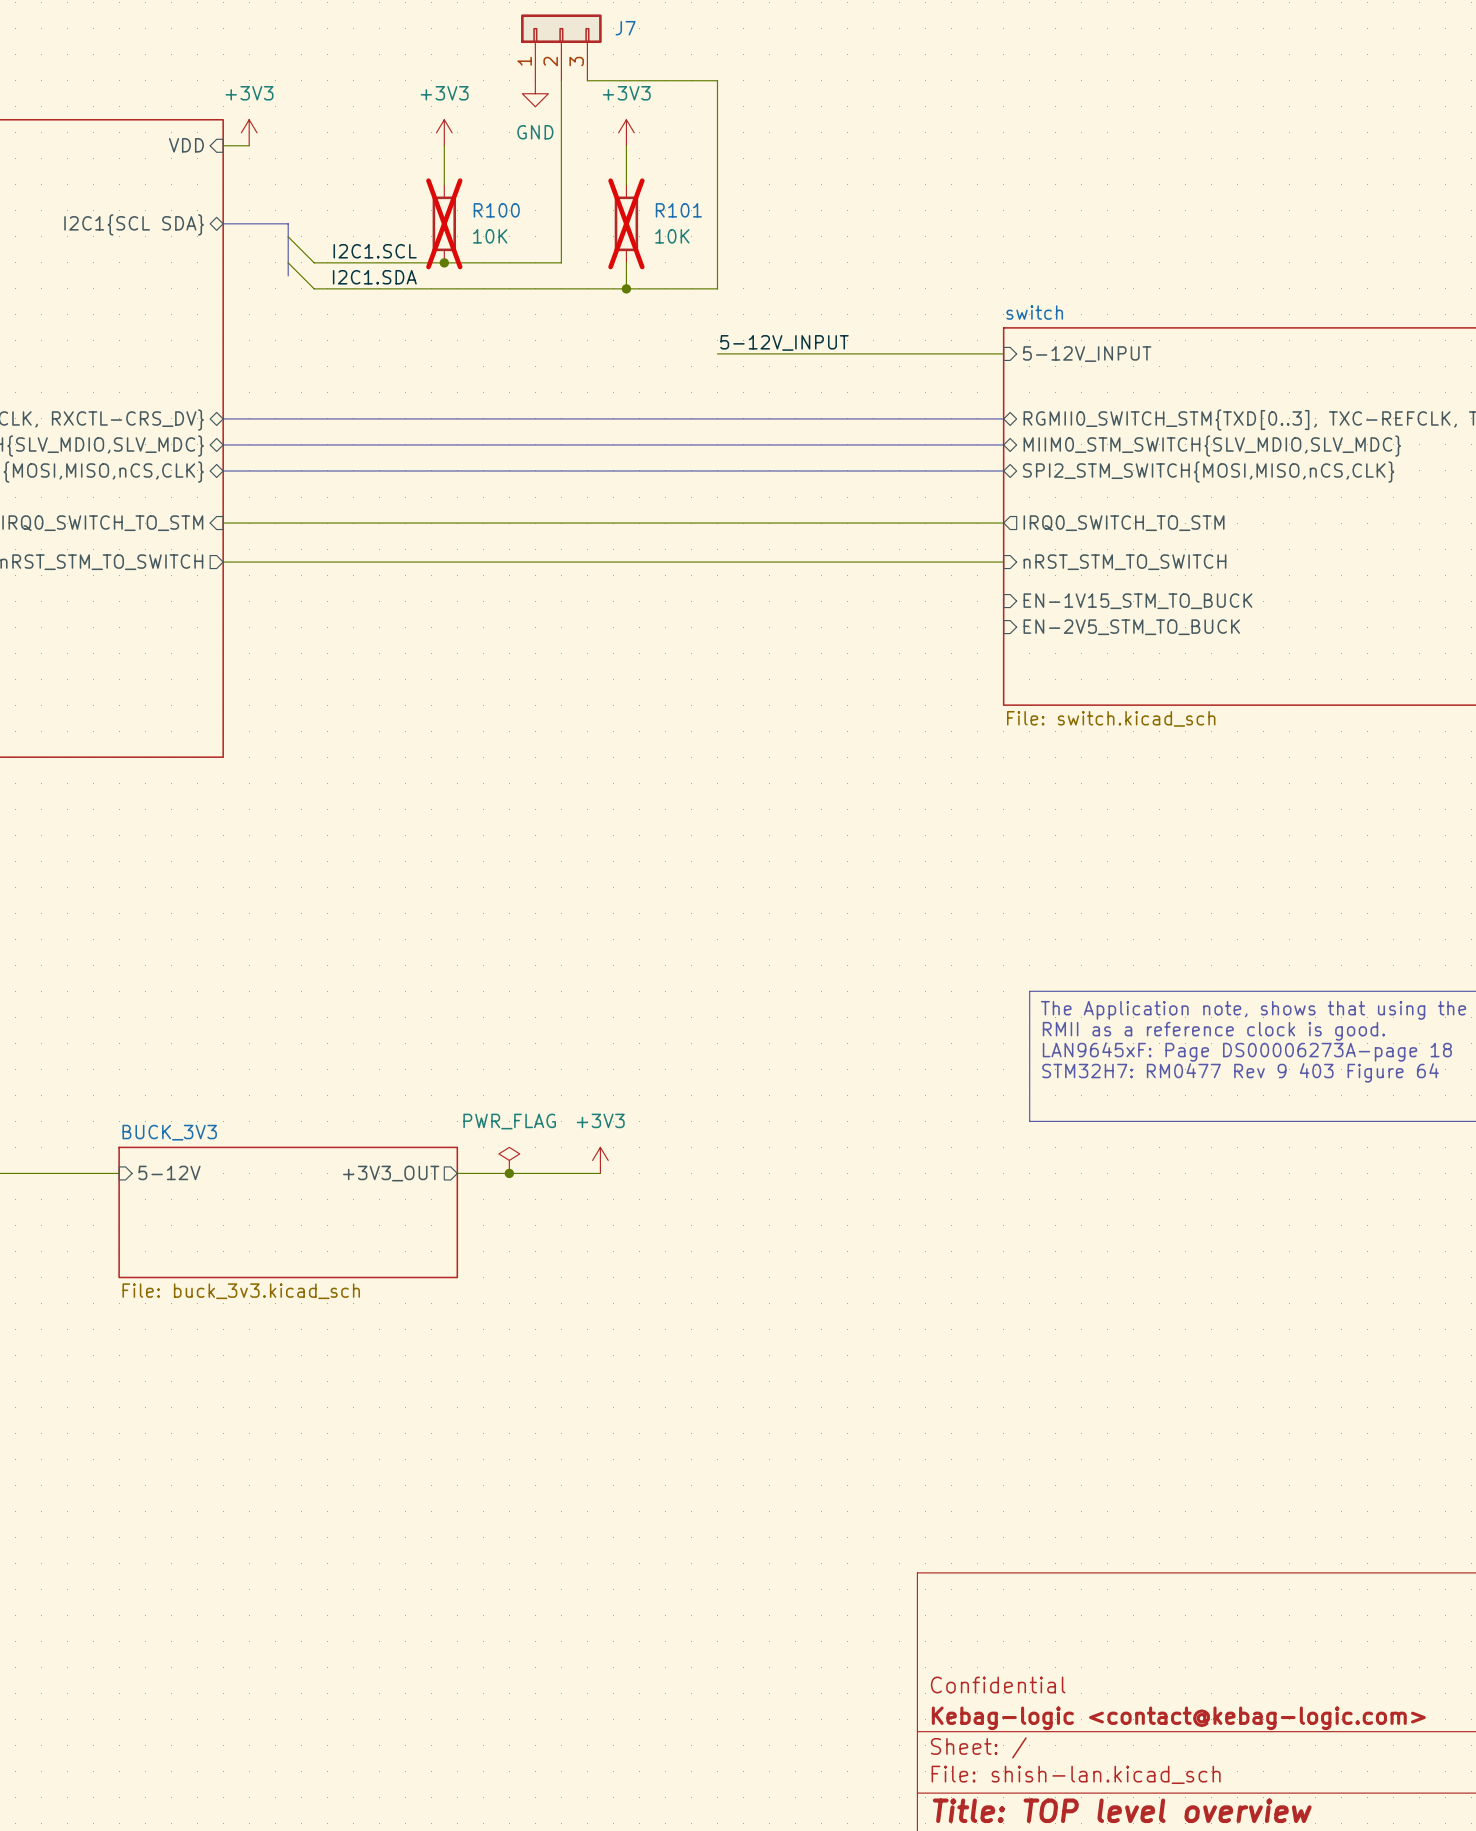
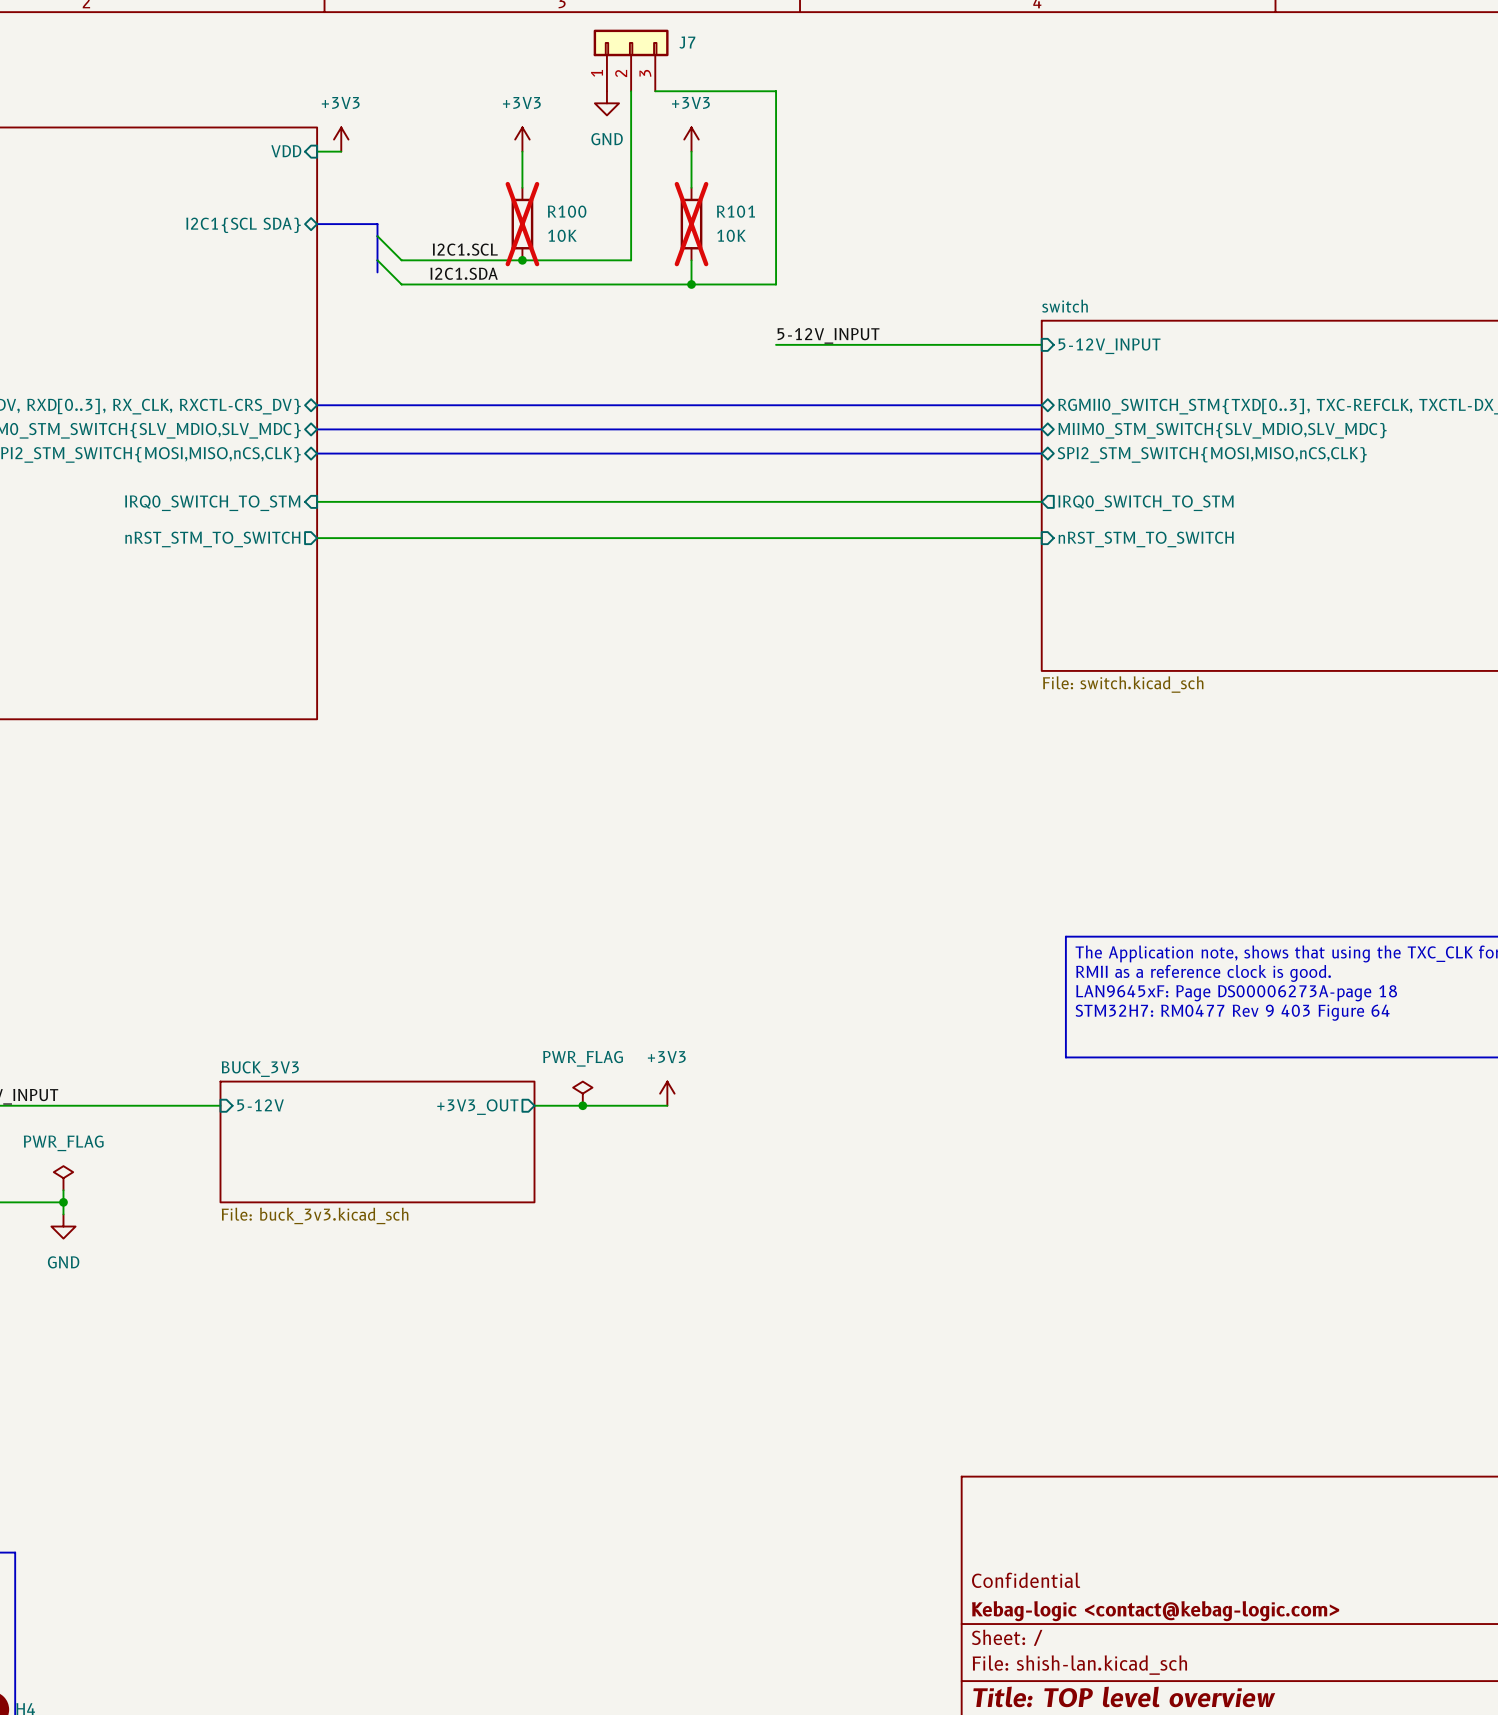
sheet pin: EN-1V15_STM_TO_BUCK (1137, 601) -> none
sheet pin: EN-2V5_STM_TO_BUCK (1131, 627) -> none

